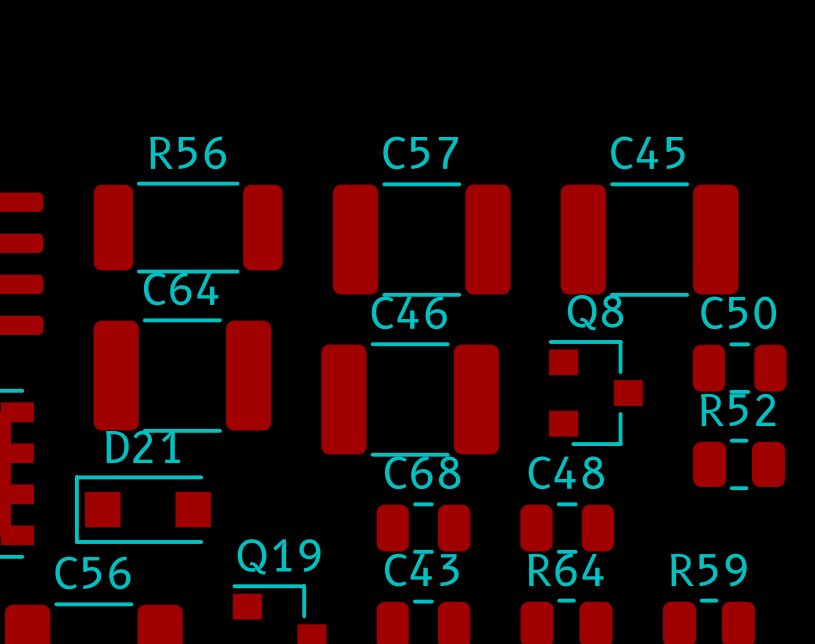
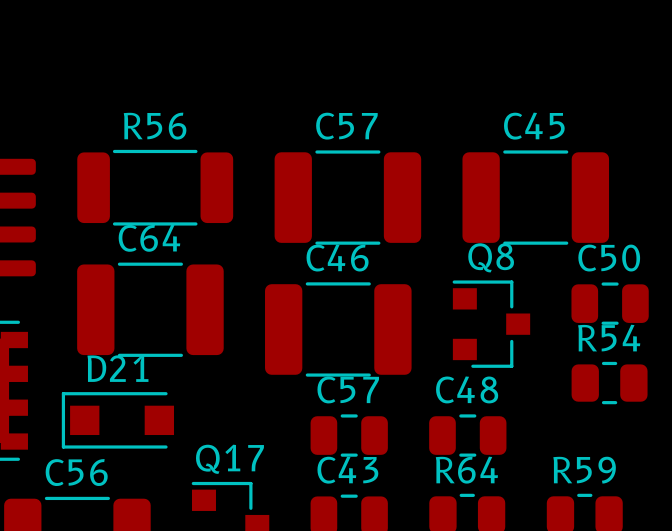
R52 name: R52 (738, 409) -> R54 (609, 338)
C68 name: C68 (422, 472) -> C57 (348, 389)
Q19 name: Q19 (279, 556) -> Q17 (229, 459)

